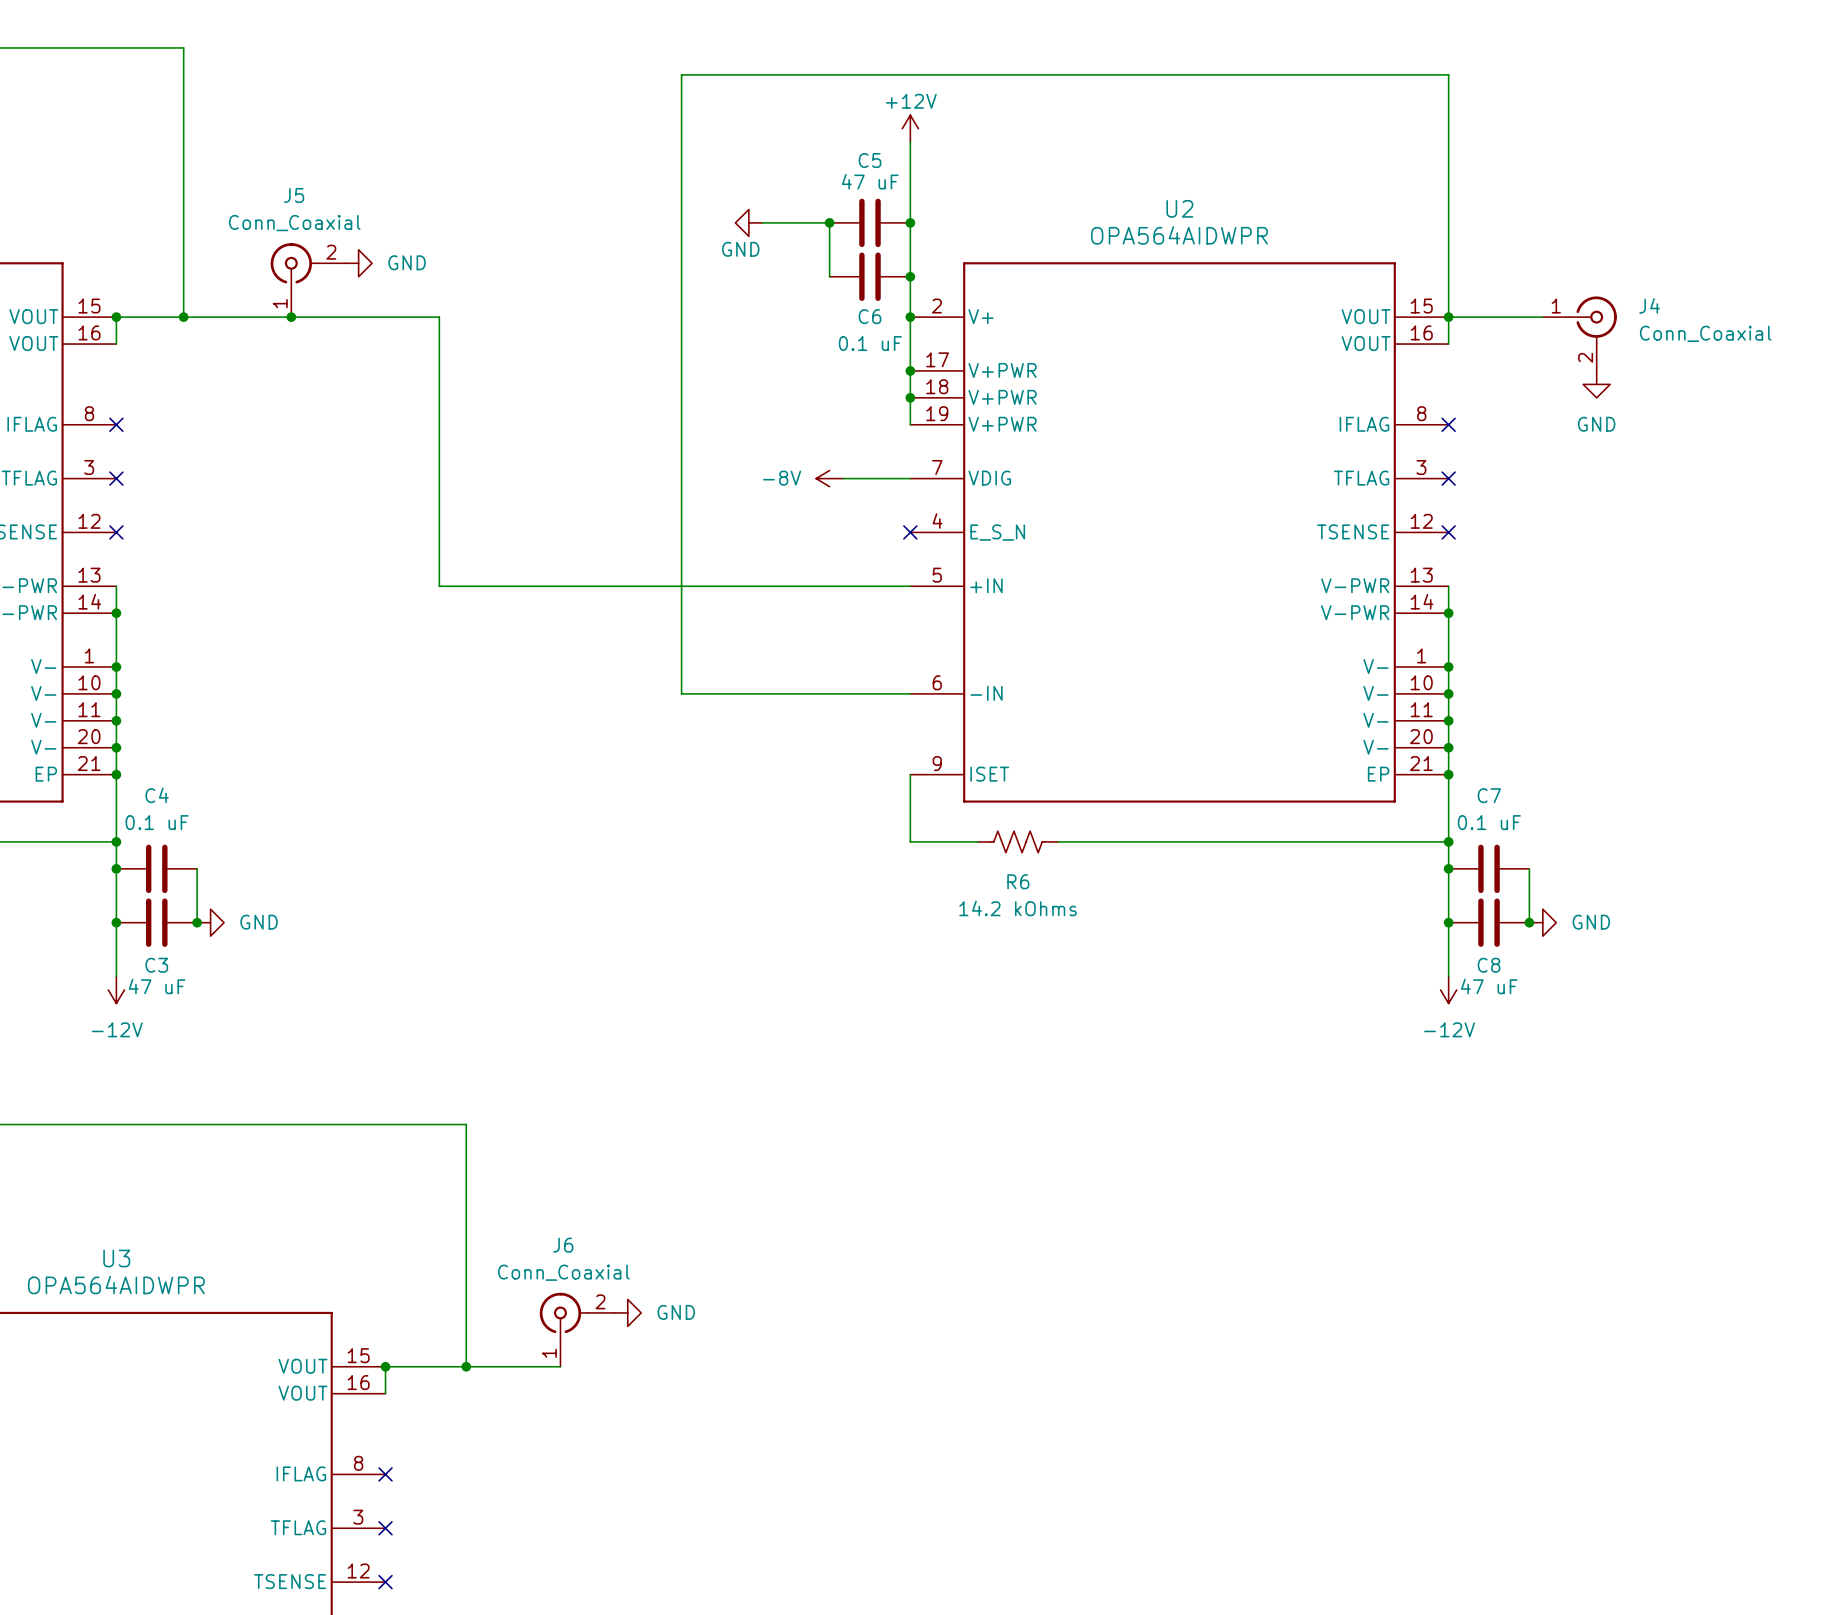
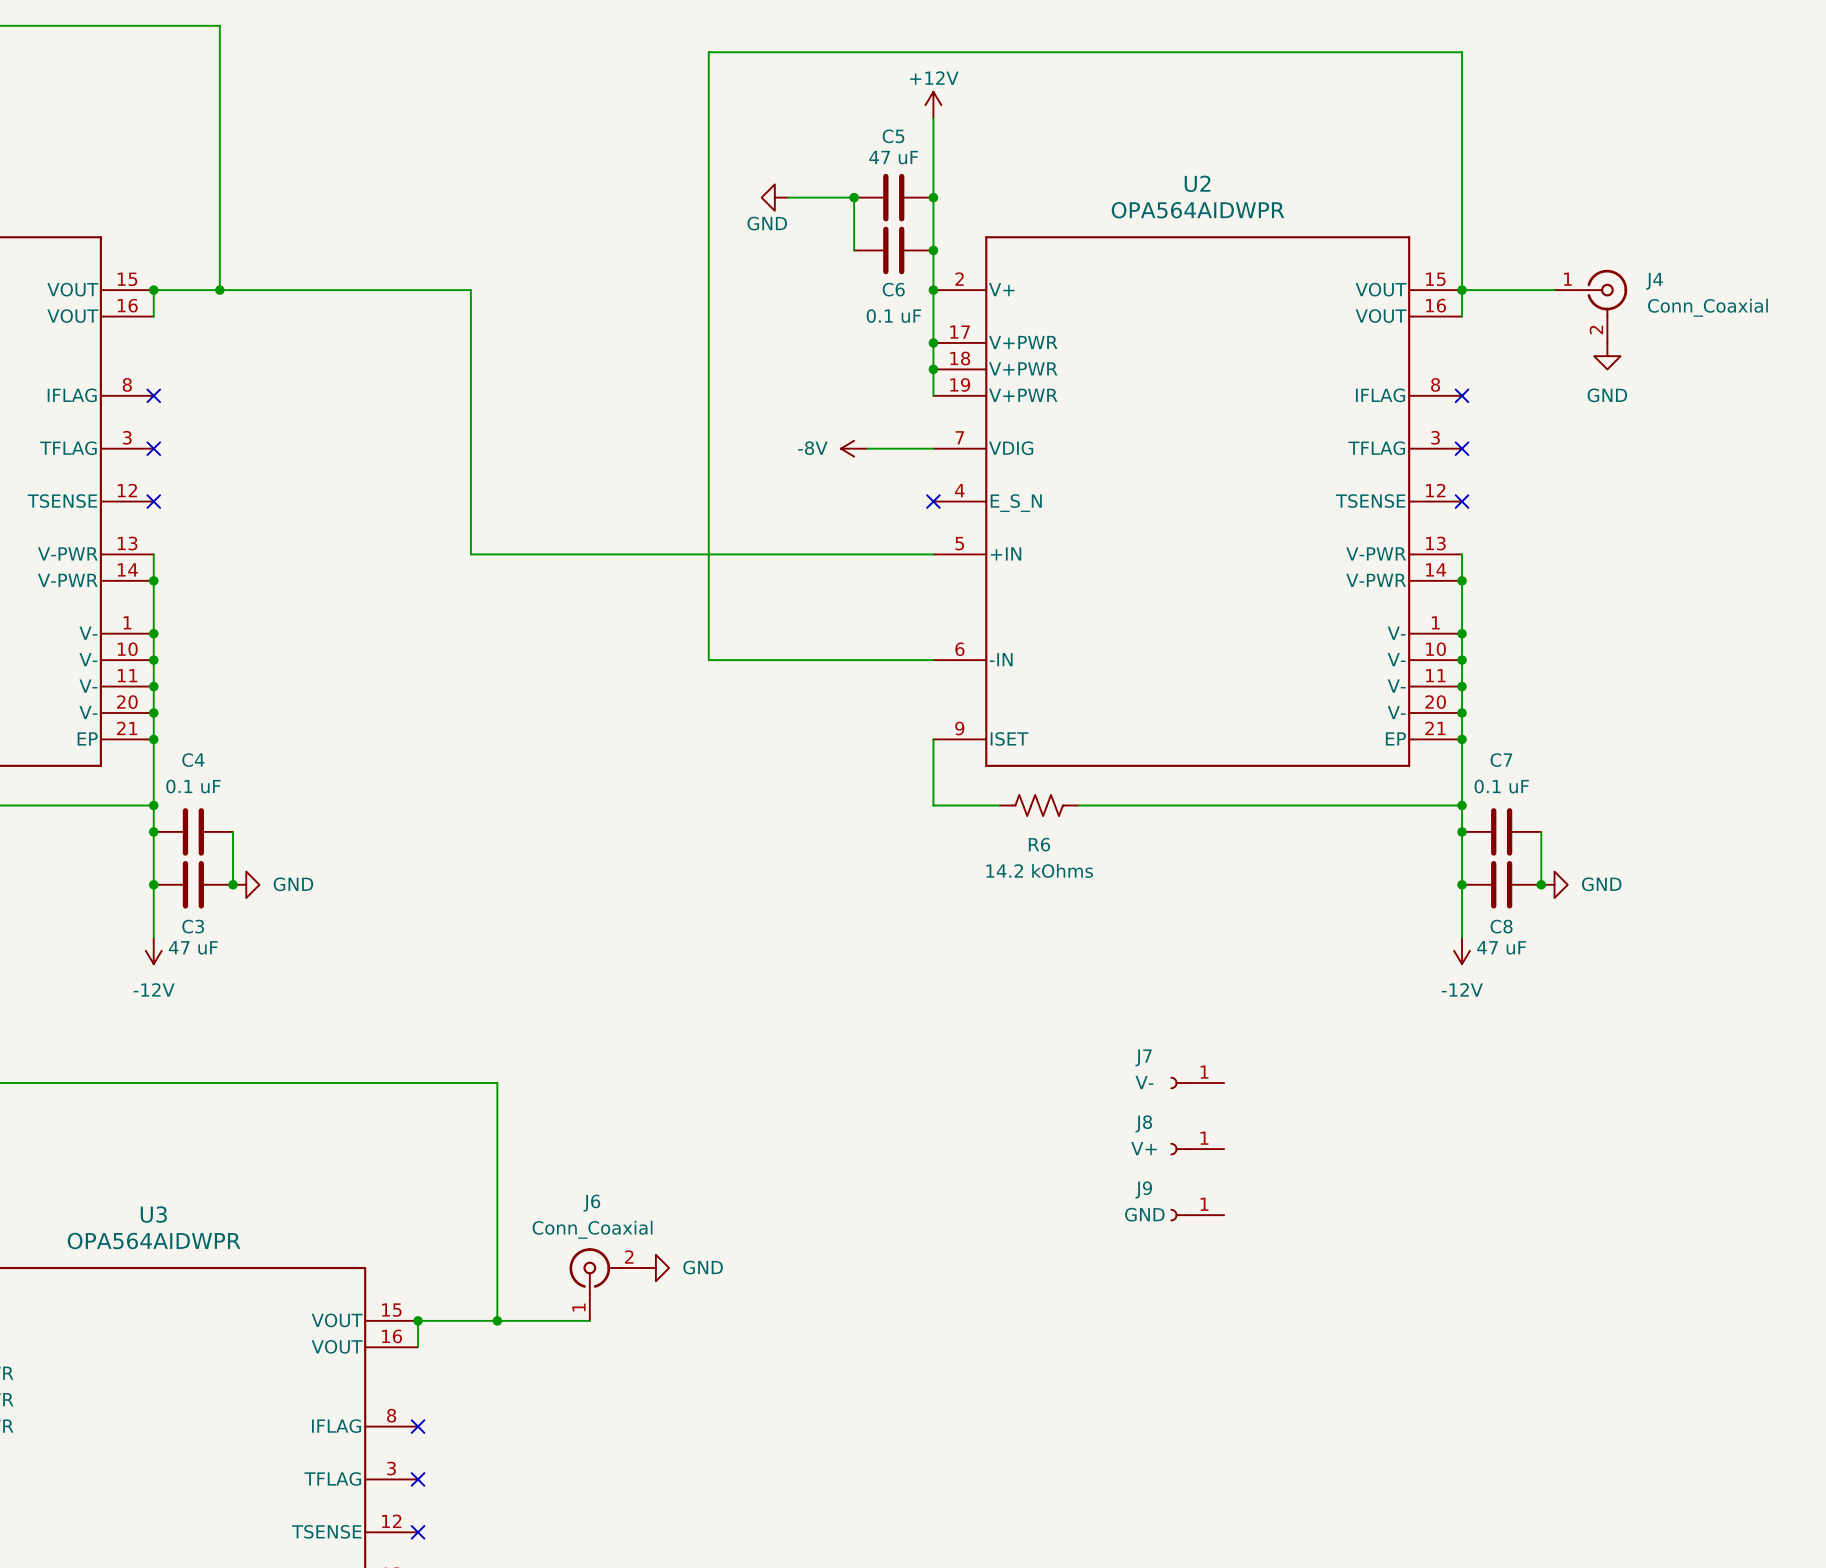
power symbol: GND (358, 263) -> none
J5: Conn_Coaxial (307, 280) -> none
junction: (291, 317) -> none
J7: none -> V- (1197, 1083)
J8: none -> V+ (1197, 1149)
J9: none -> GND (1197, 1215)

